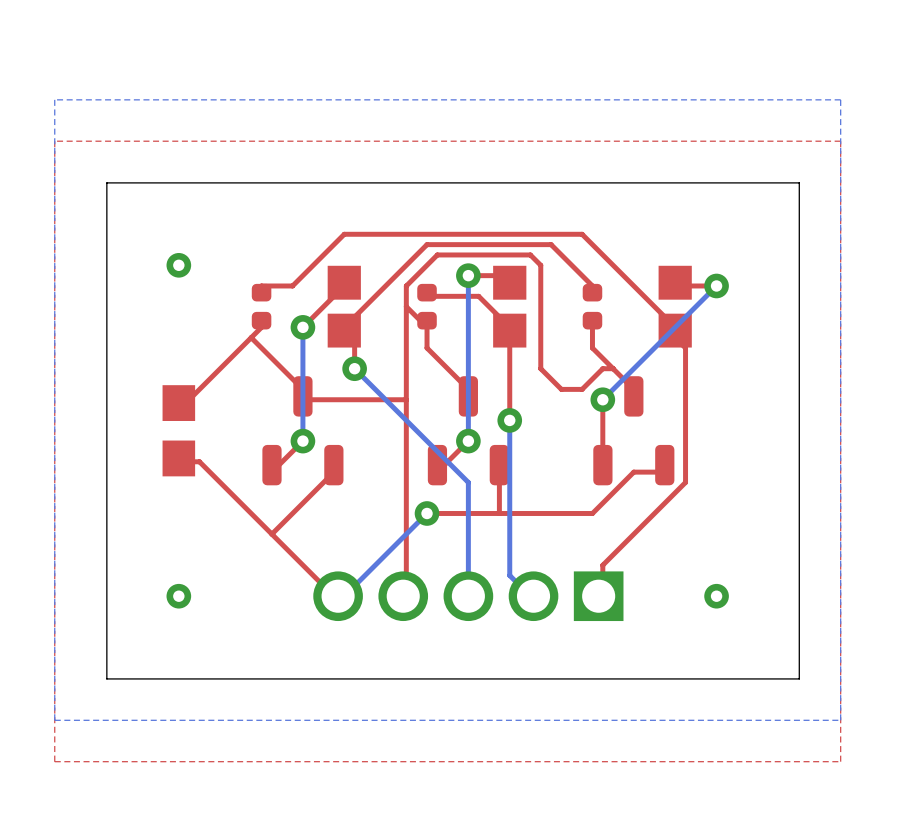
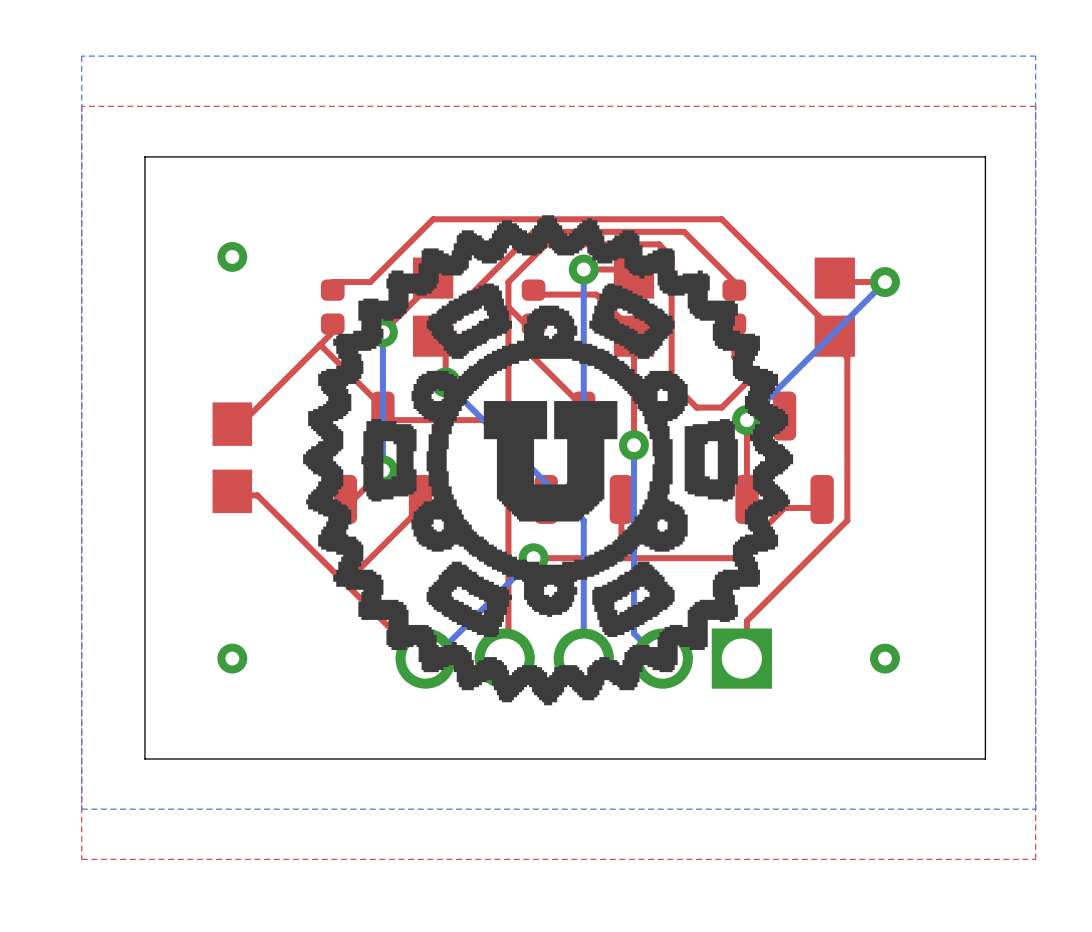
drawing: none -> [303, 215, 794, 706]

